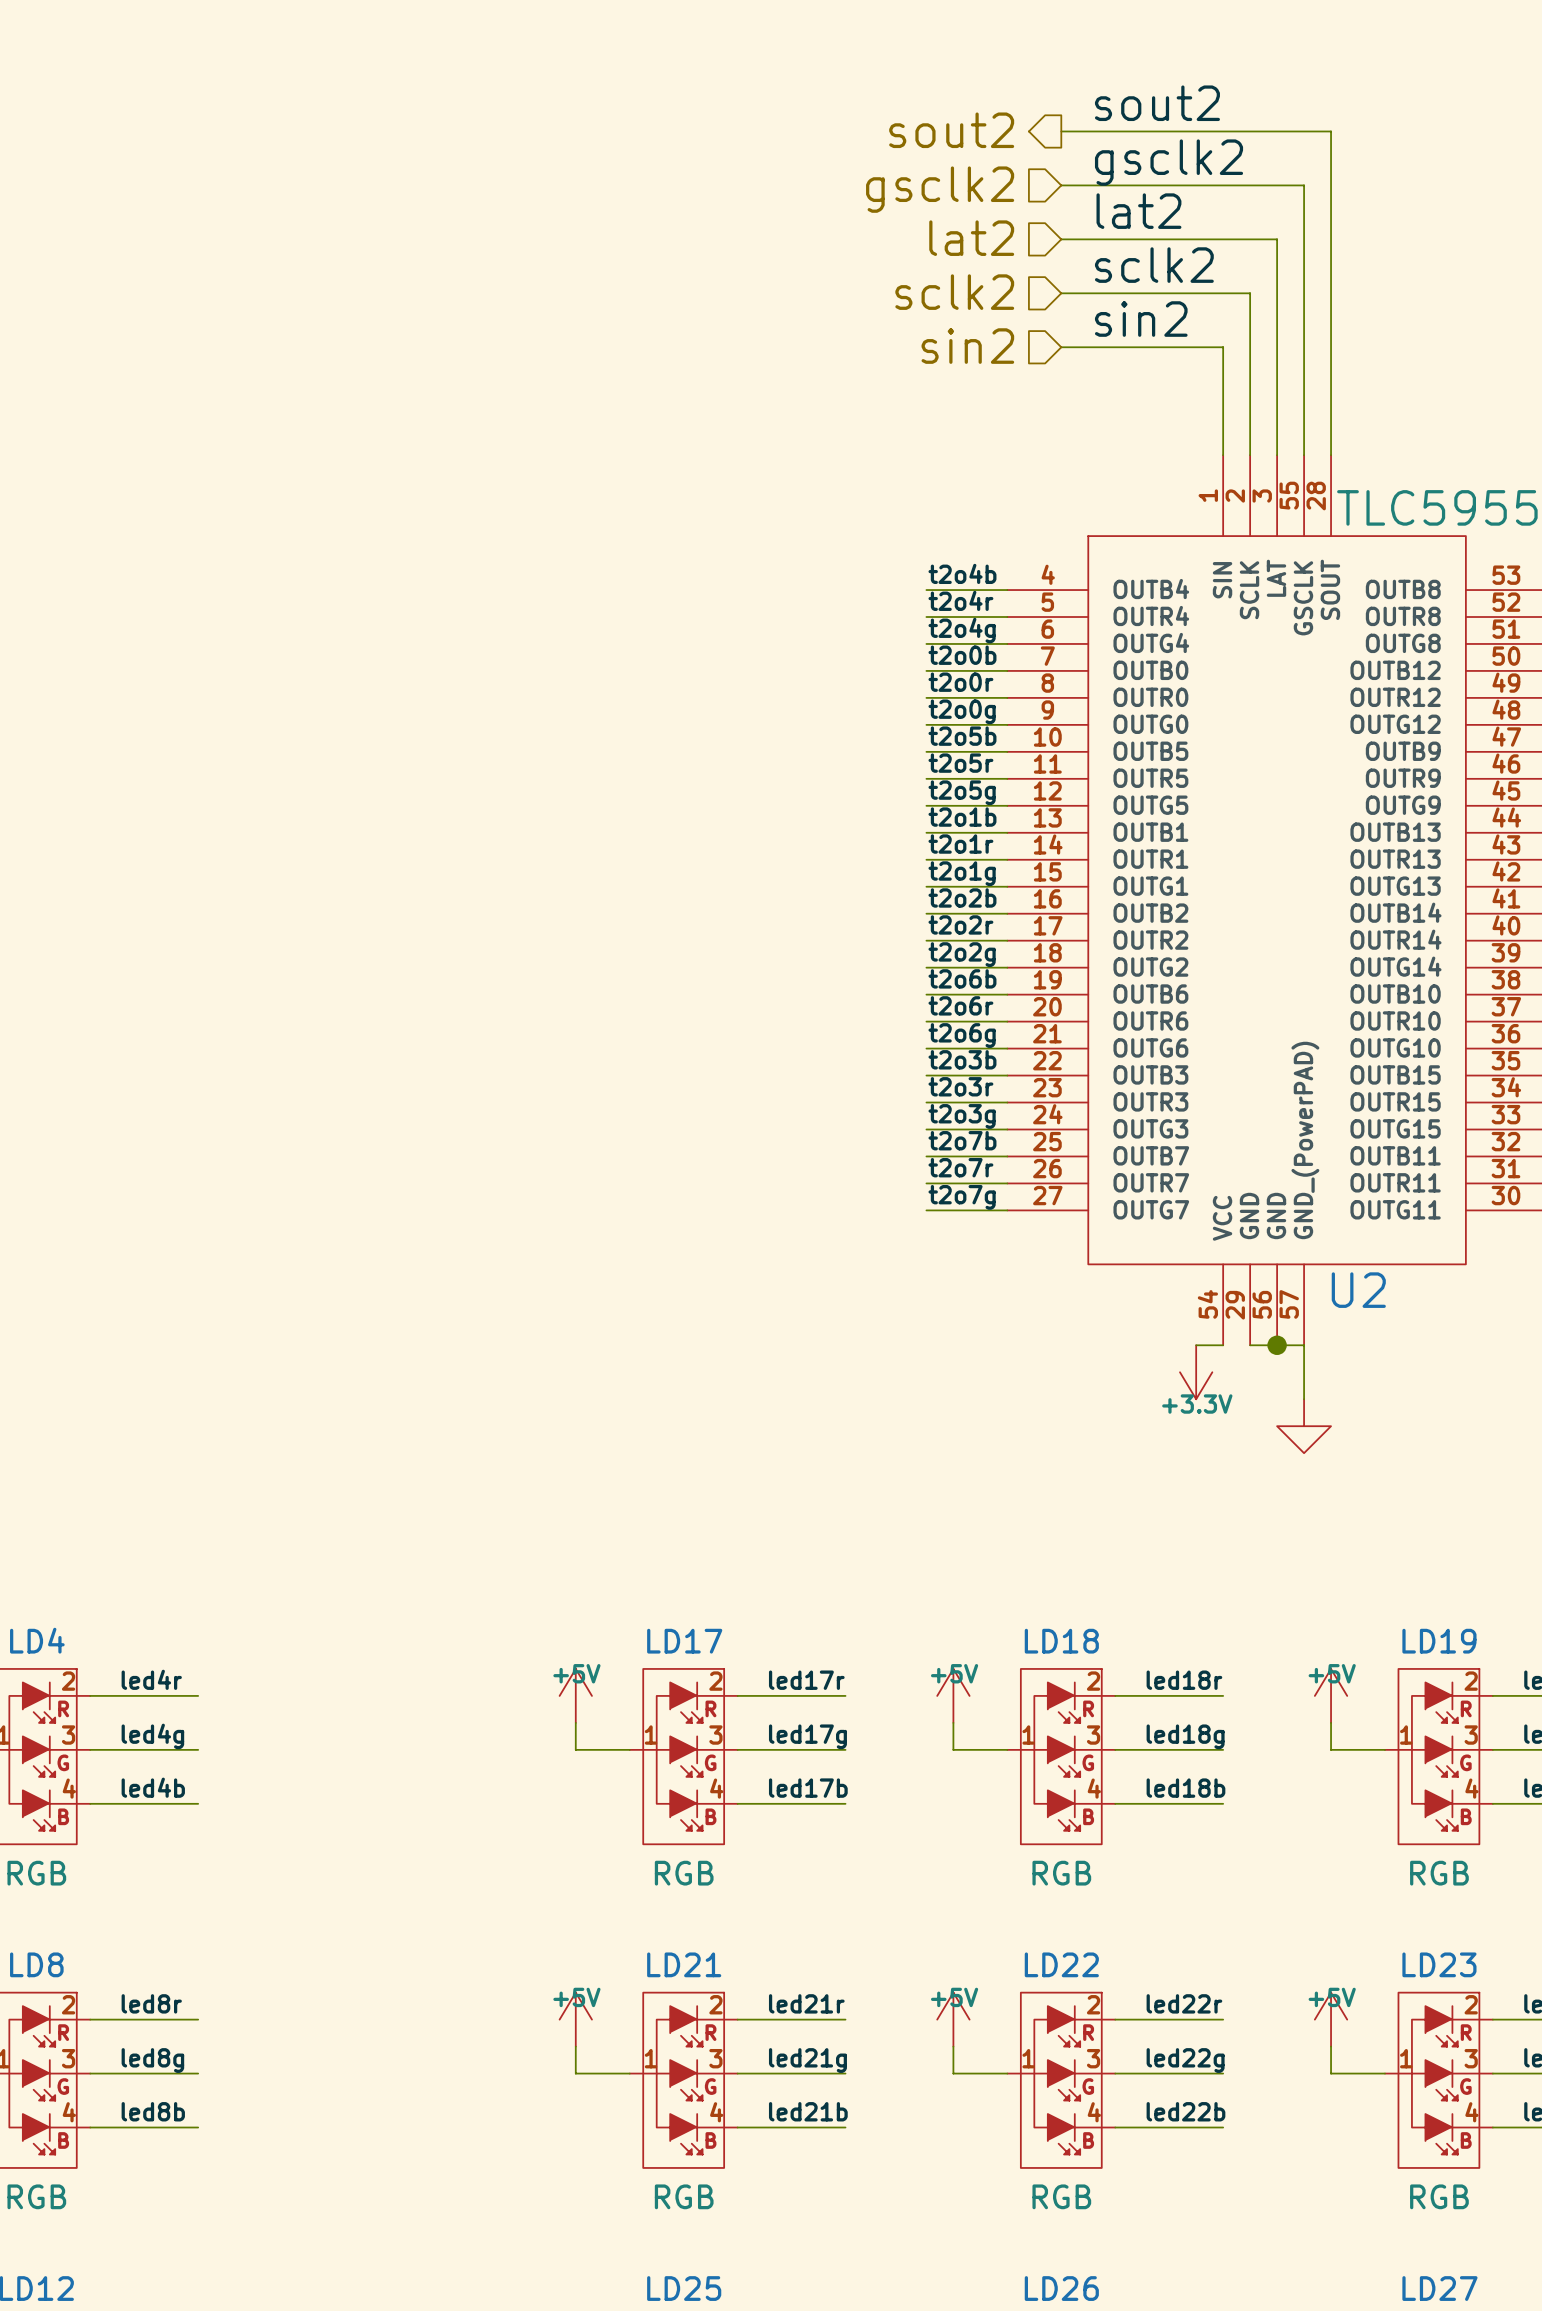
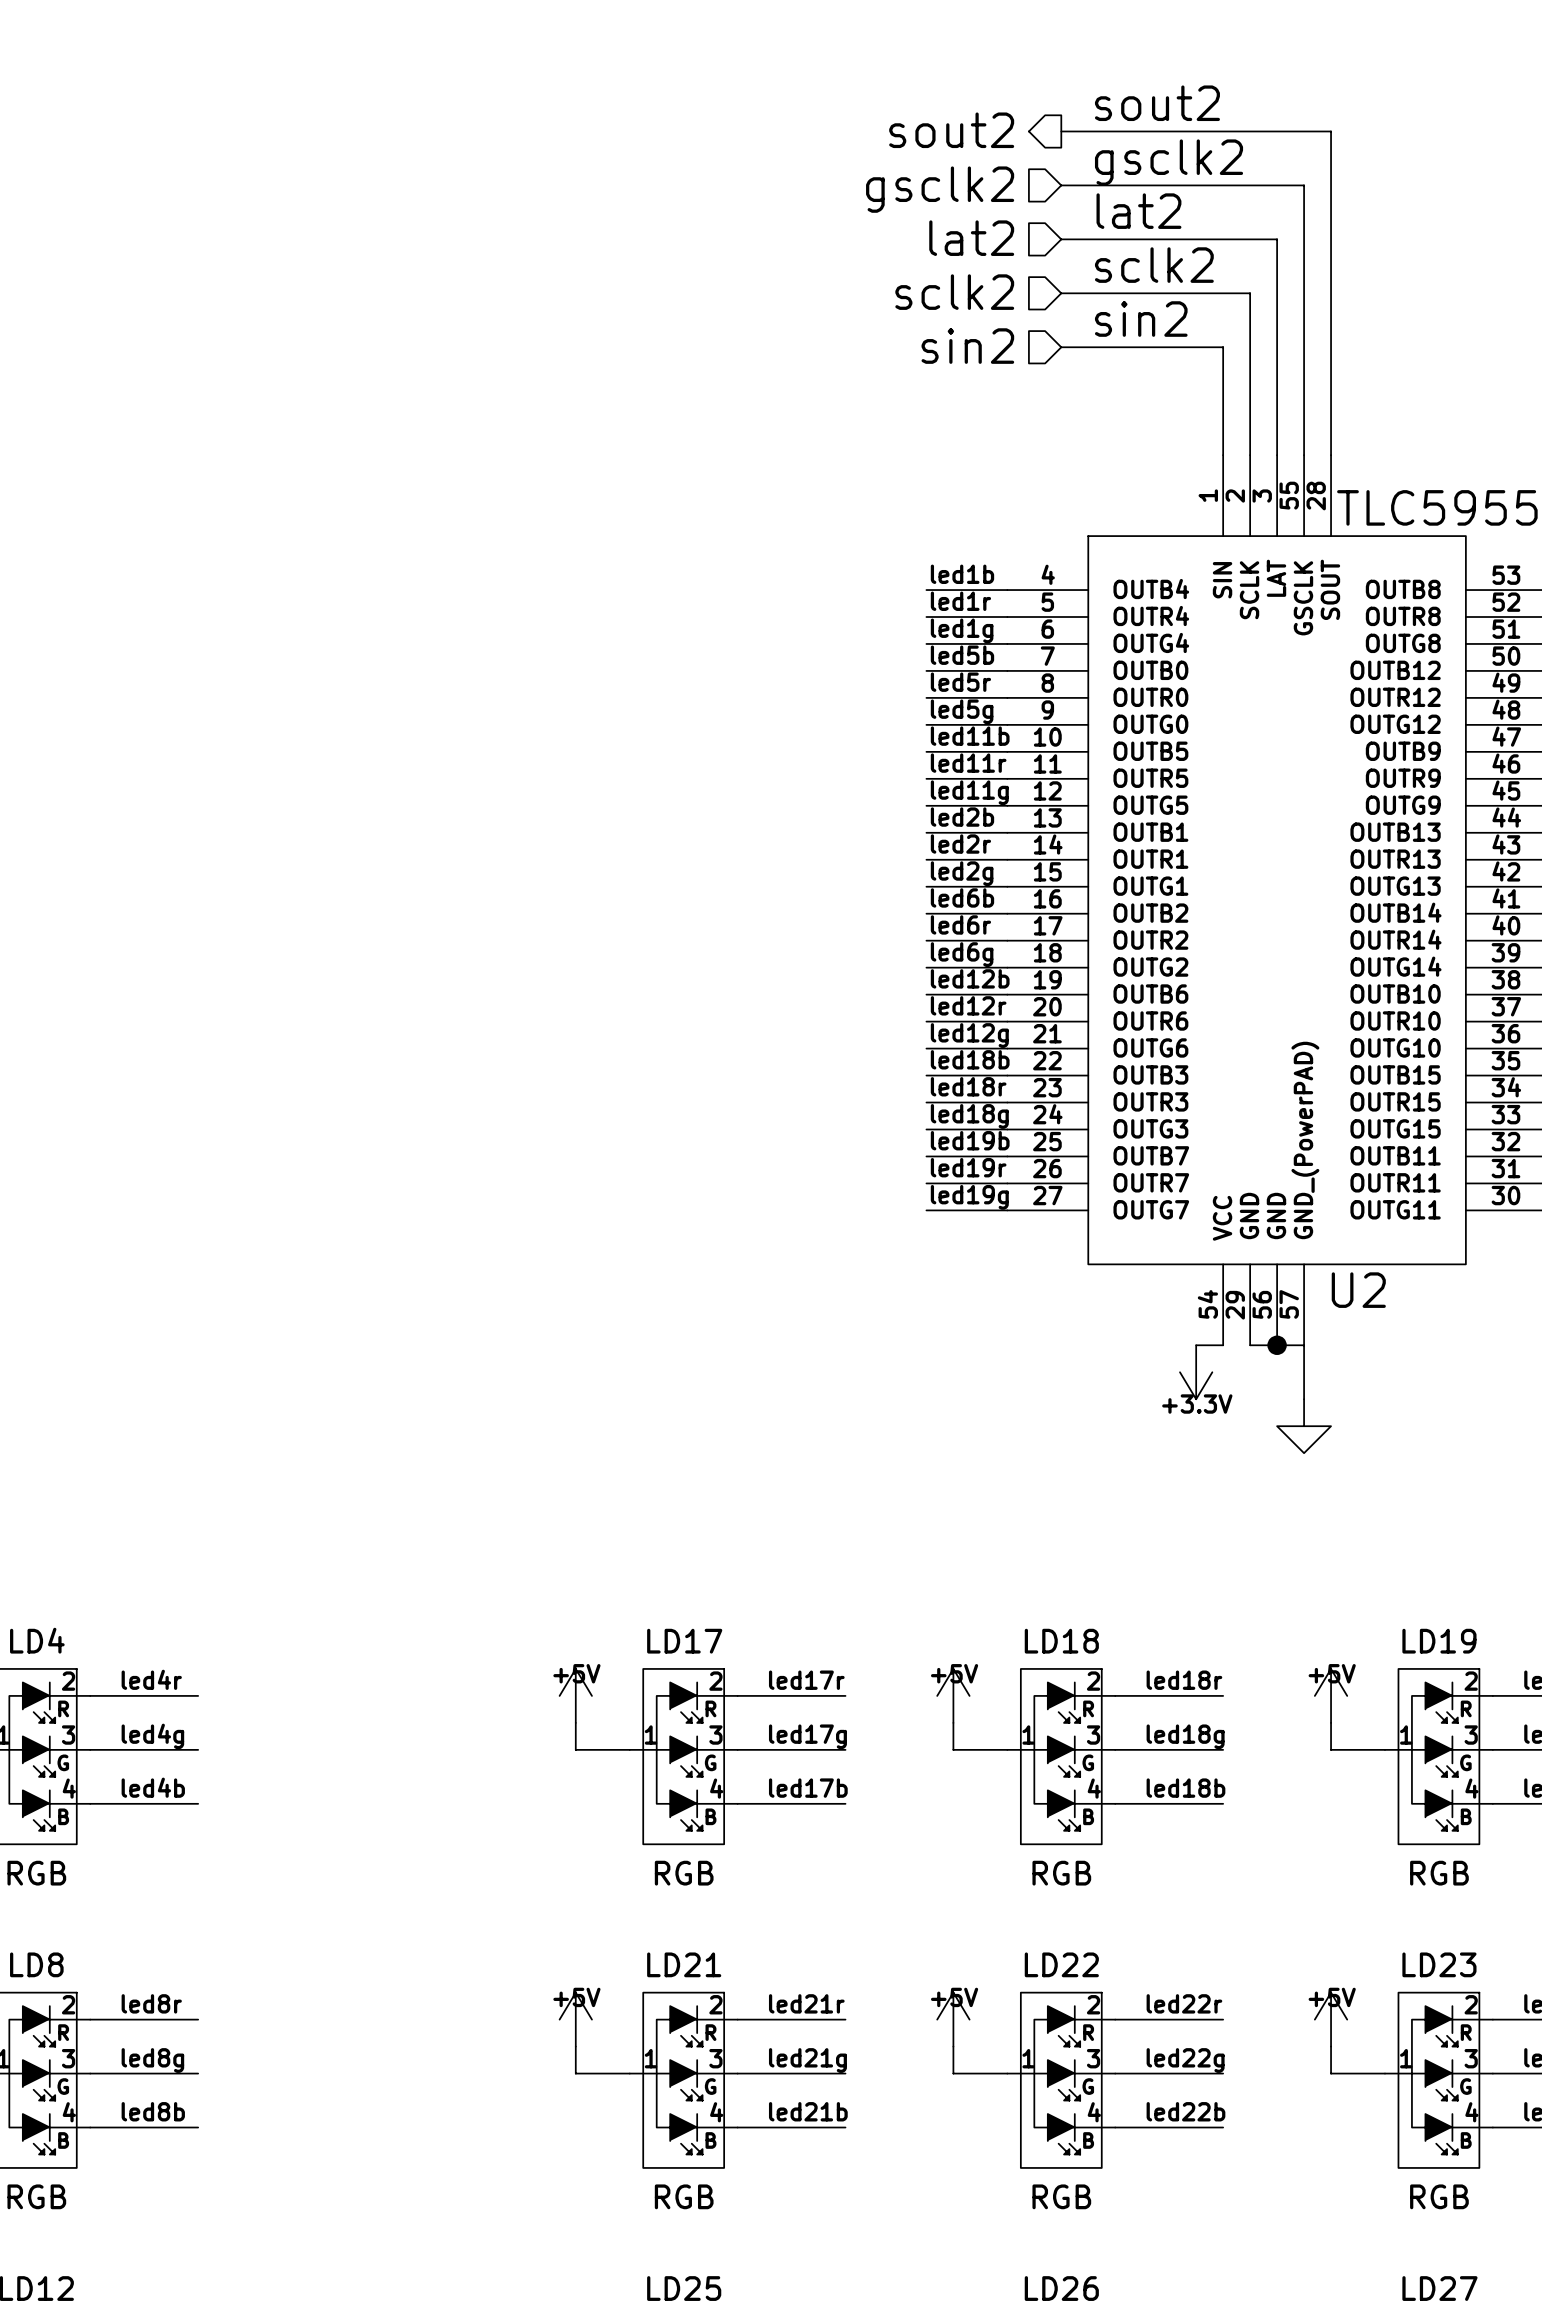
label: t2o4b (962, 573) -> led1b (962, 574)
label: t2o4r (960, 600) -> led1r (960, 601)
label: t2o4g (962, 630) -> led1g (962, 630)
label: t2o0b (962, 655) -> led5b (962, 655)
label: t2o0r (960, 682) -> led5r (960, 682)
label: t2o0g (962, 711) -> led5g (962, 711)
label: t2o5b (962, 736) -> led11b (970, 736)
label: t2o5r (960, 763) -> led11r (968, 763)
label: t2o5g (962, 792) -> led11g (969, 792)
label: t2o1b (962, 817) -> led2b (962, 817)
label: t2o1r (960, 844) -> led2r (960, 844)
label: t2o1g (962, 873) -> led2g (962, 873)
label: t2o2b (962, 897) -> led6b (962, 897)
label: t2o2r (960, 924) -> led6r (960, 924)
label: t2o2g (962, 954) -> led6g (962, 954)
label: t2o6b (962, 978) -> led12b (970, 978)
label: t2o6r (960, 1005) -> led12r (968, 1005)
label: t2o6g (962, 1035) -> led12g (969, 1035)
label: t2o3b (962, 1059) -> led18b (970, 1059)
label: t2o3r (960, 1086) -> led18r (968, 1086)
label: t2o3g (962, 1116) -> led18g (969, 1116)
label: t2o7b (962, 1140) -> led19b (970, 1140)
label: t2o7r (960, 1167) -> led19r (968, 1167)
label: t2o7g (962, 1197) -> led19g (969, 1197)

